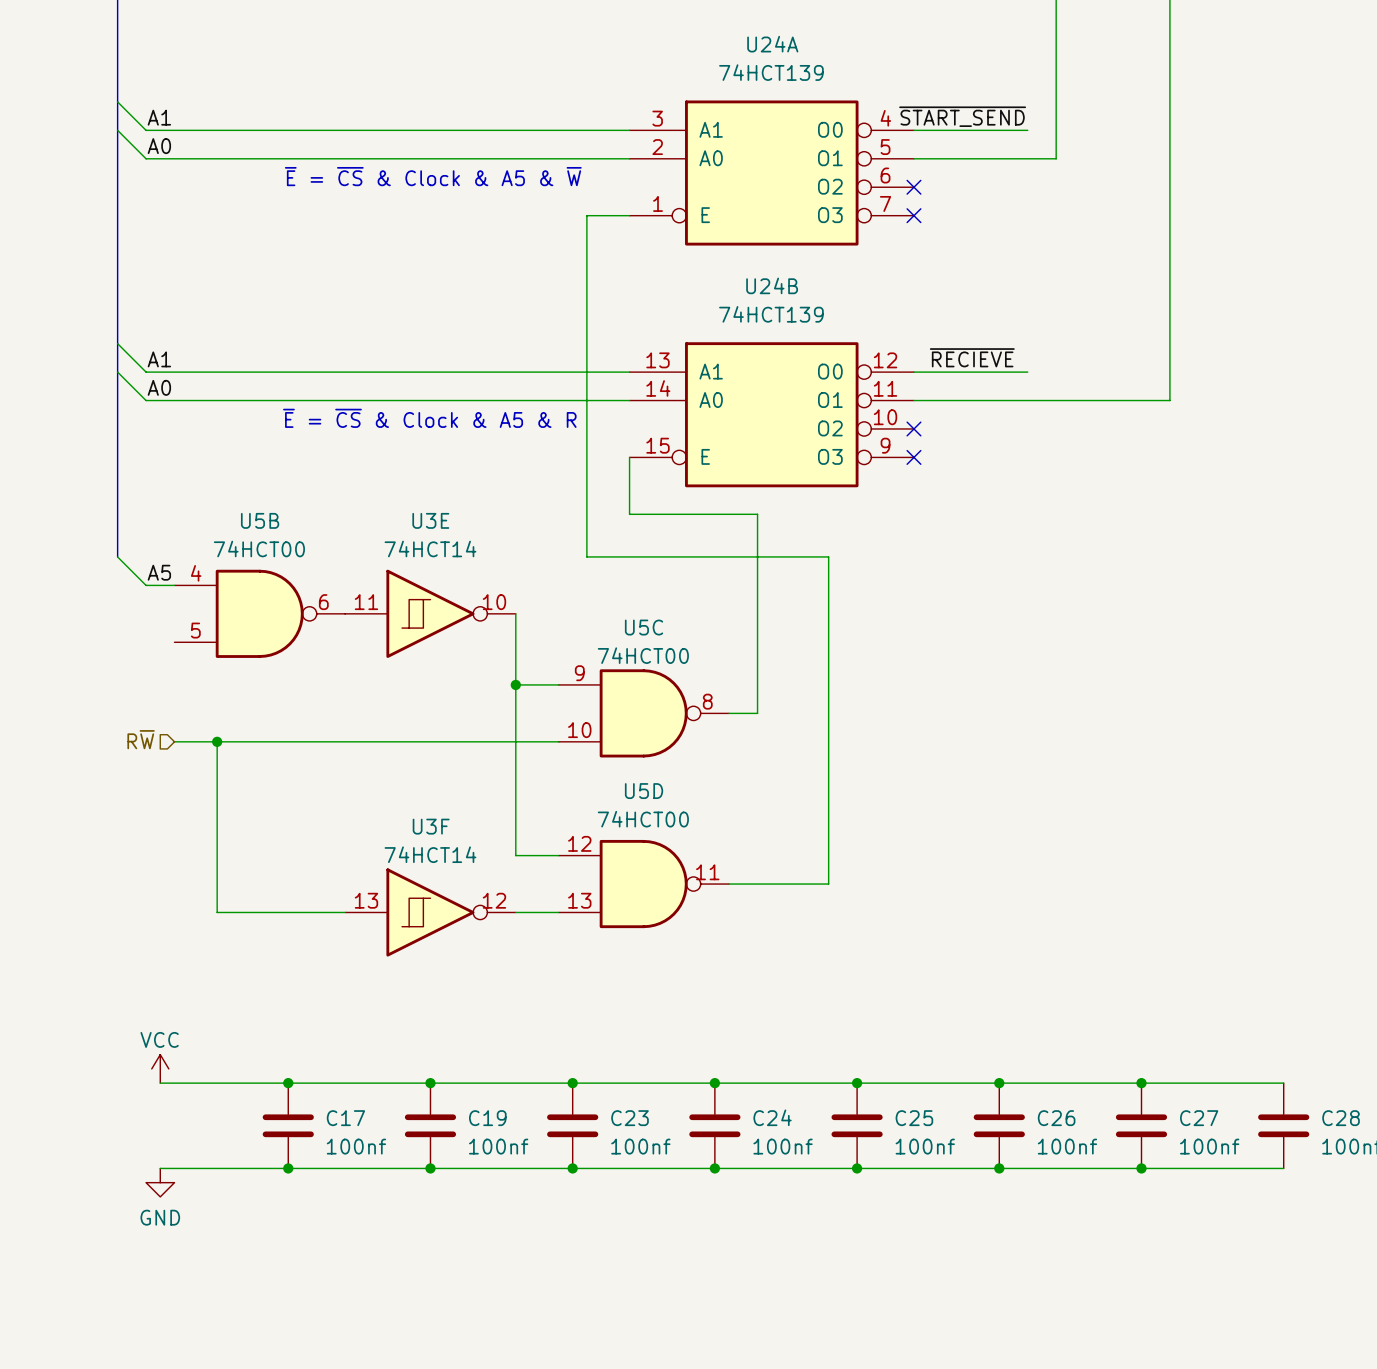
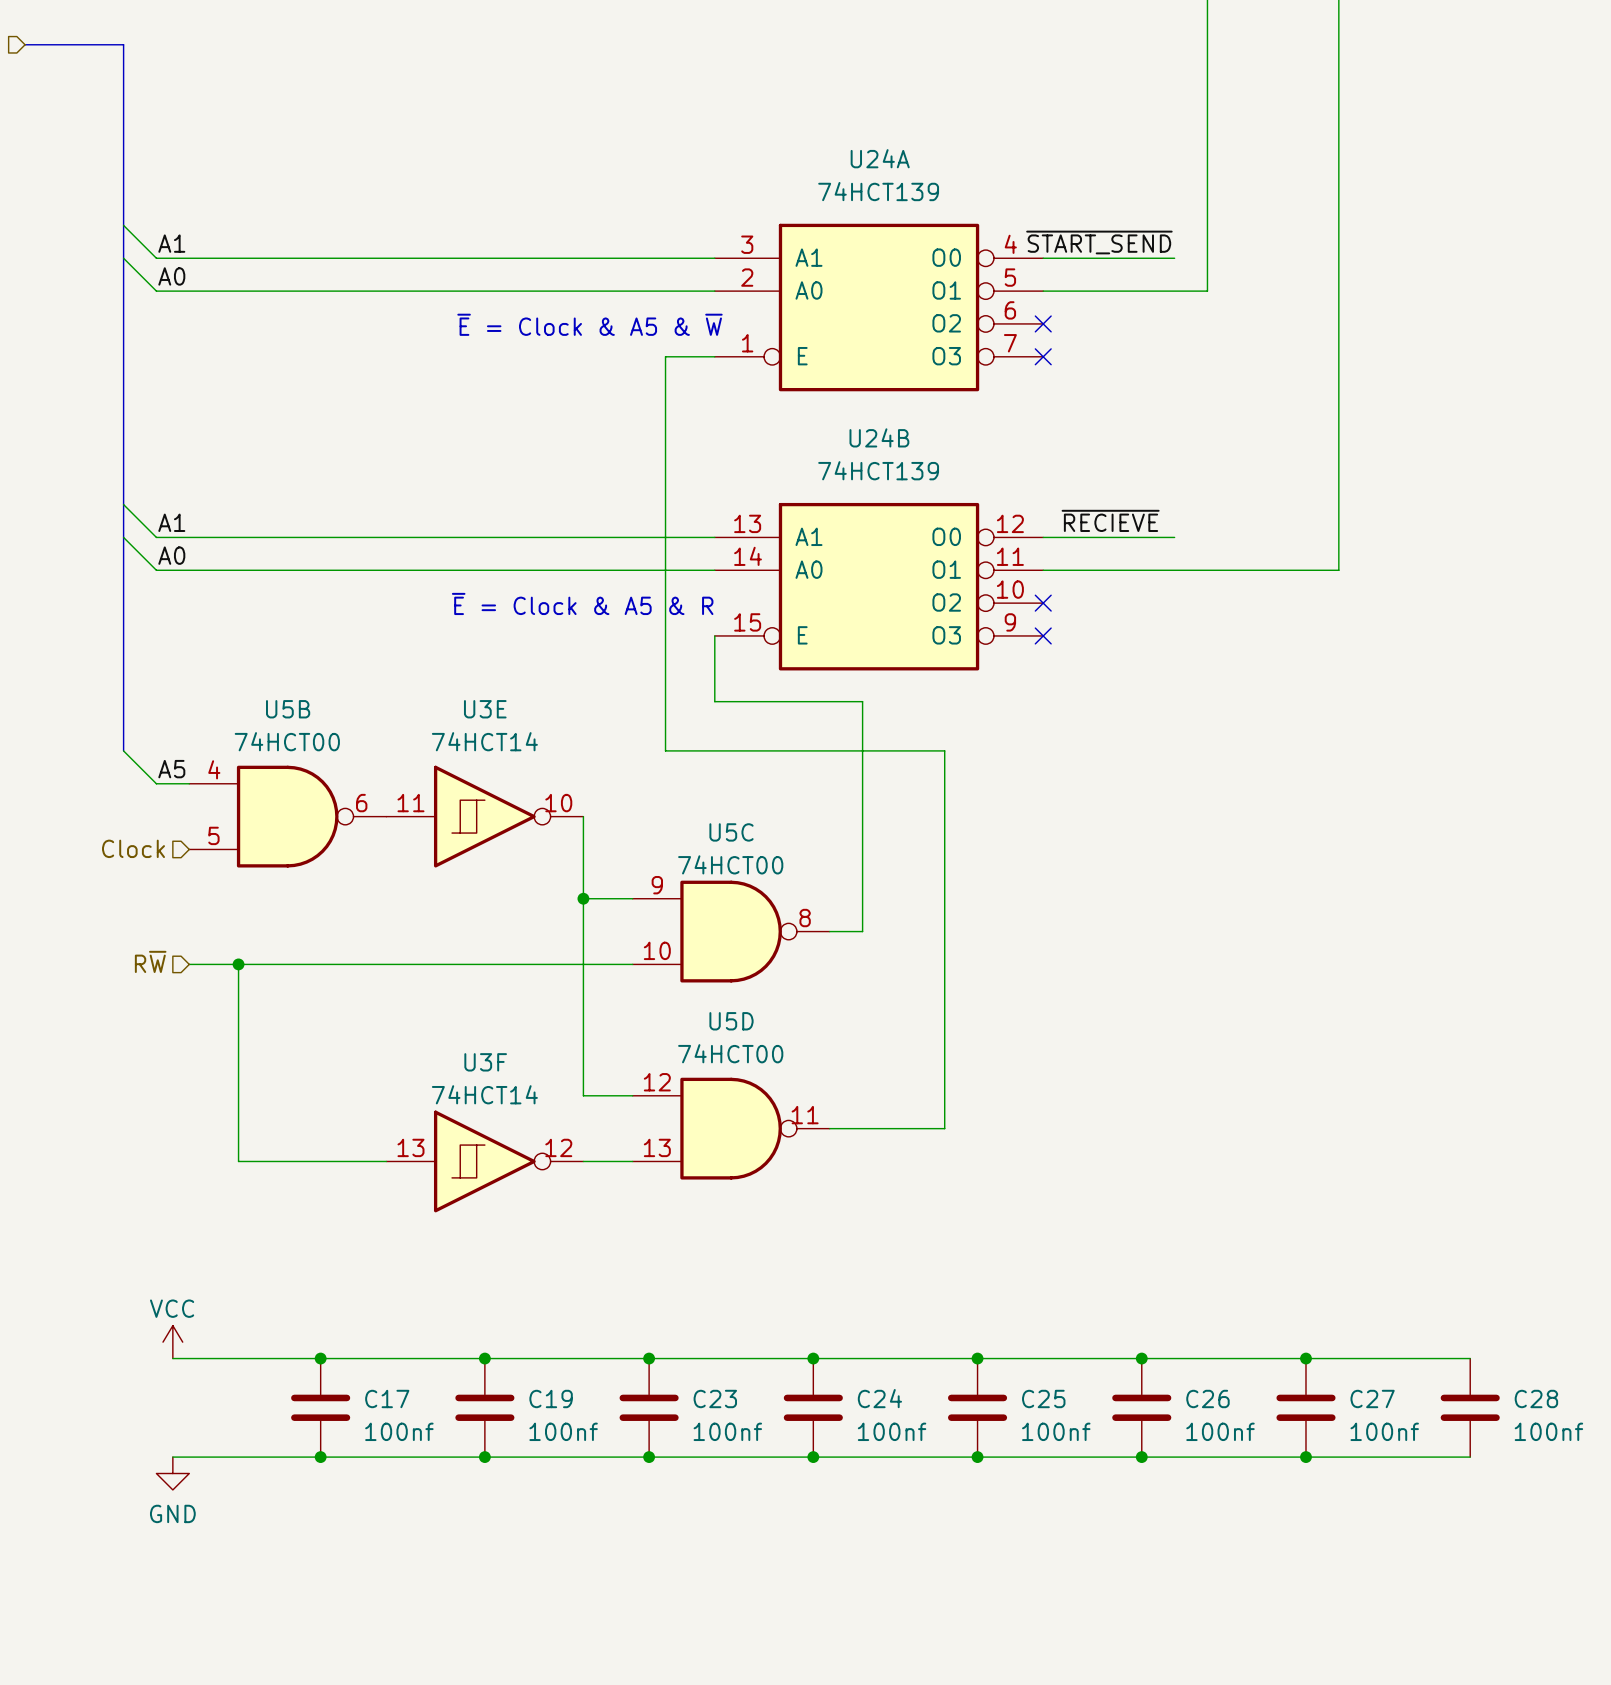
text: ~{E} = ~{CS} & Clock & A5 & ~{W} (433, 176) -> ~{E} = Clock & A5 & ~{W} (589, 324)
text: ~{E} = ~{CS} & Clock & A5 & R (429, 418) -> ~{E} = Clock & A5 & R (582, 603)
hierarchical label: none -> Clock (133, 848)

